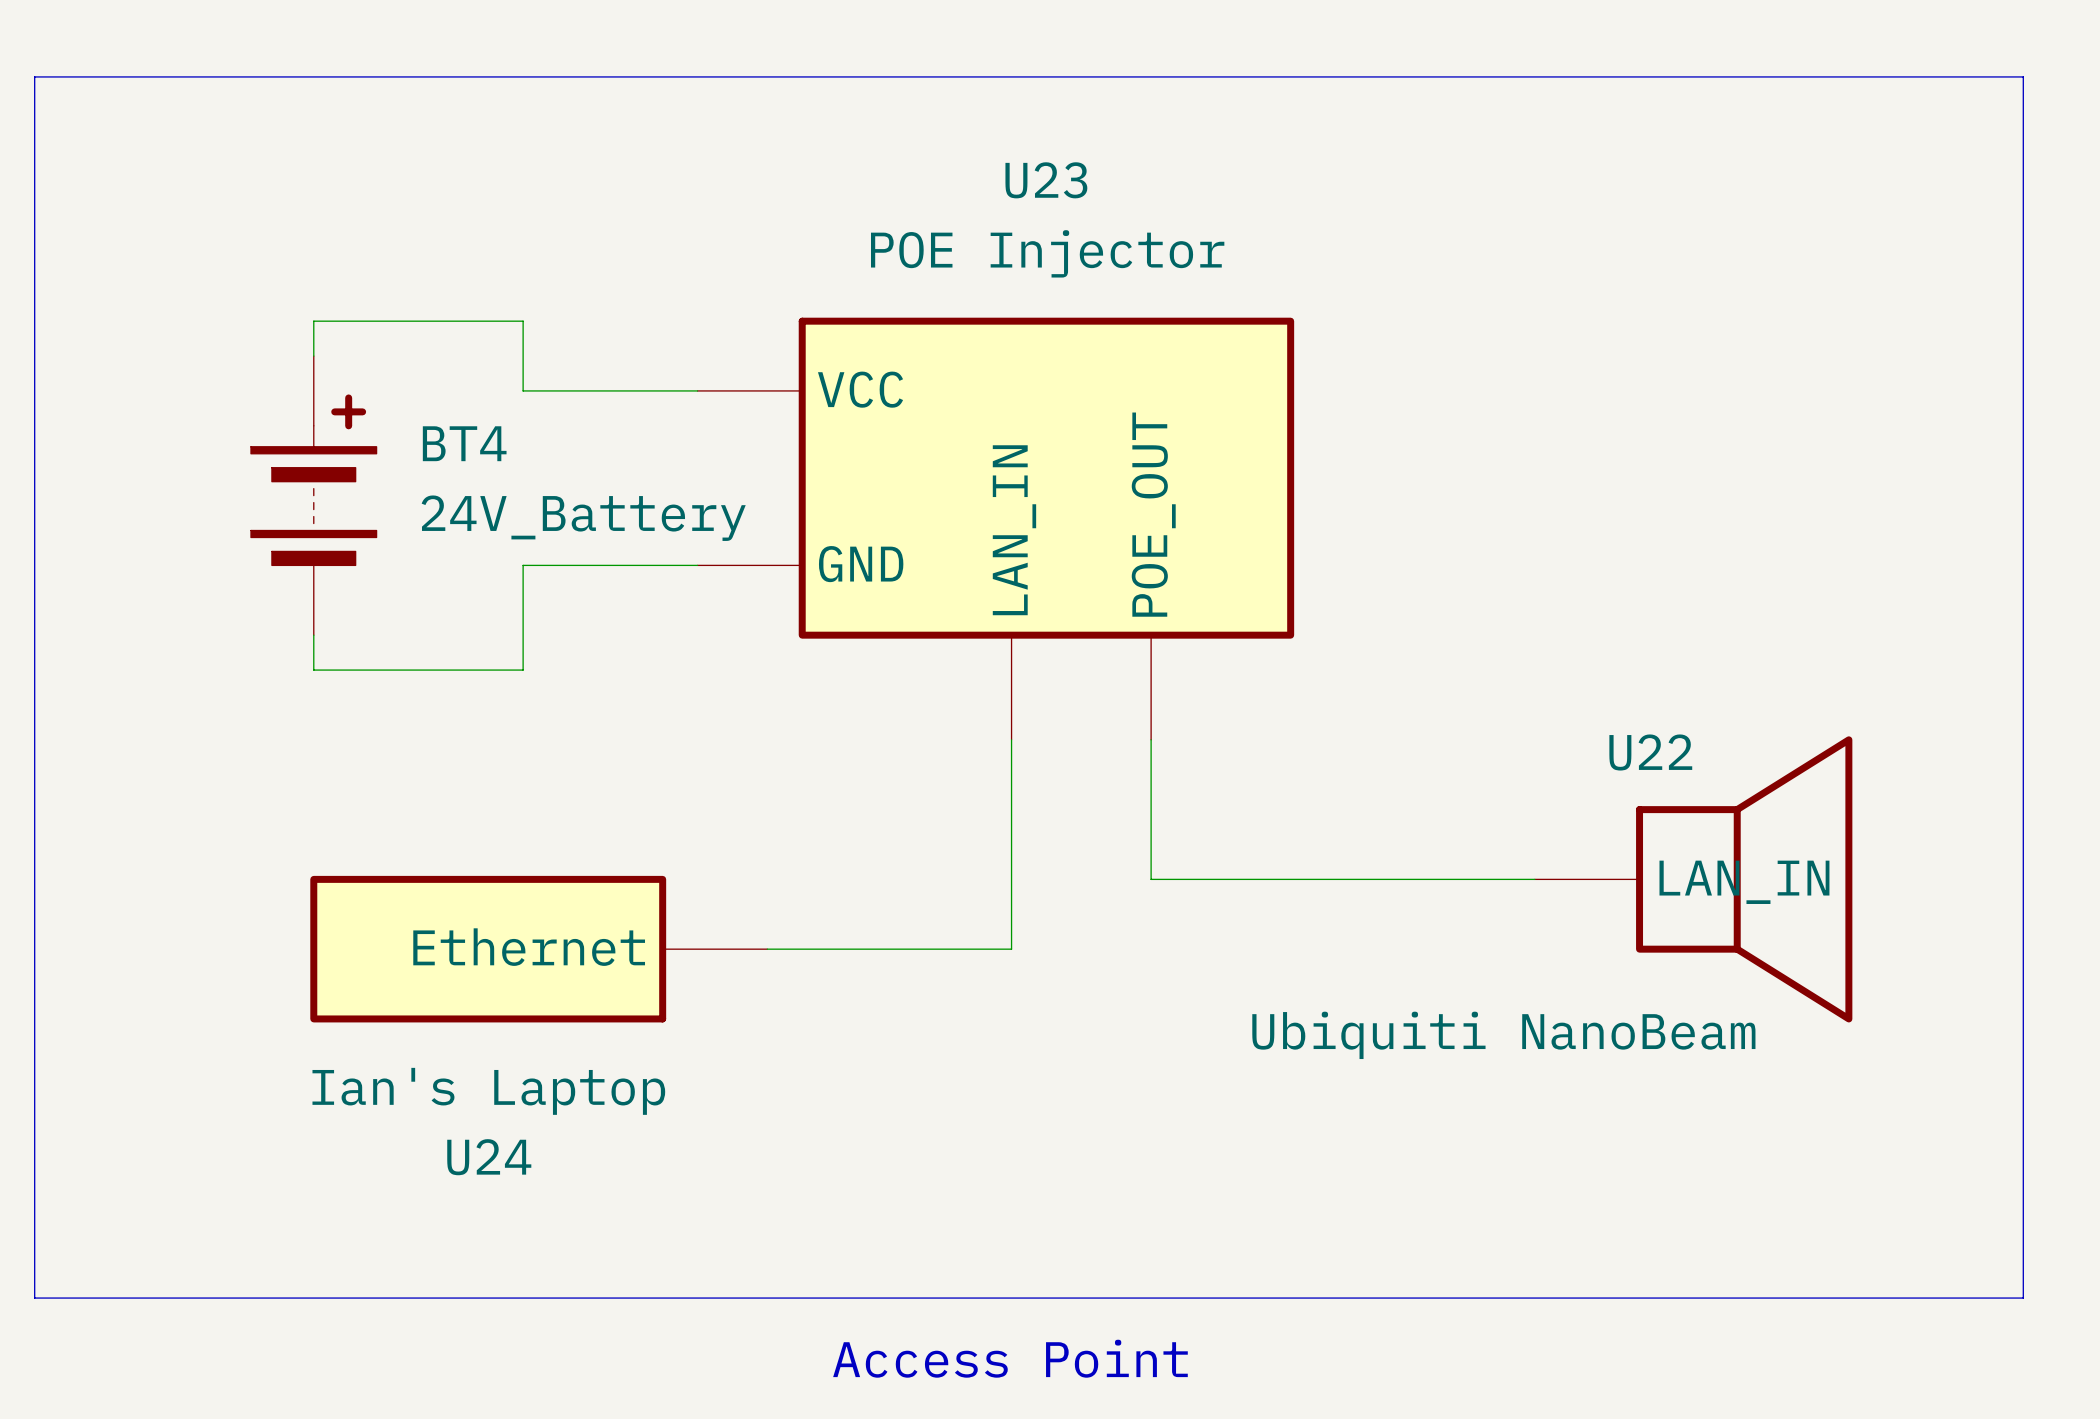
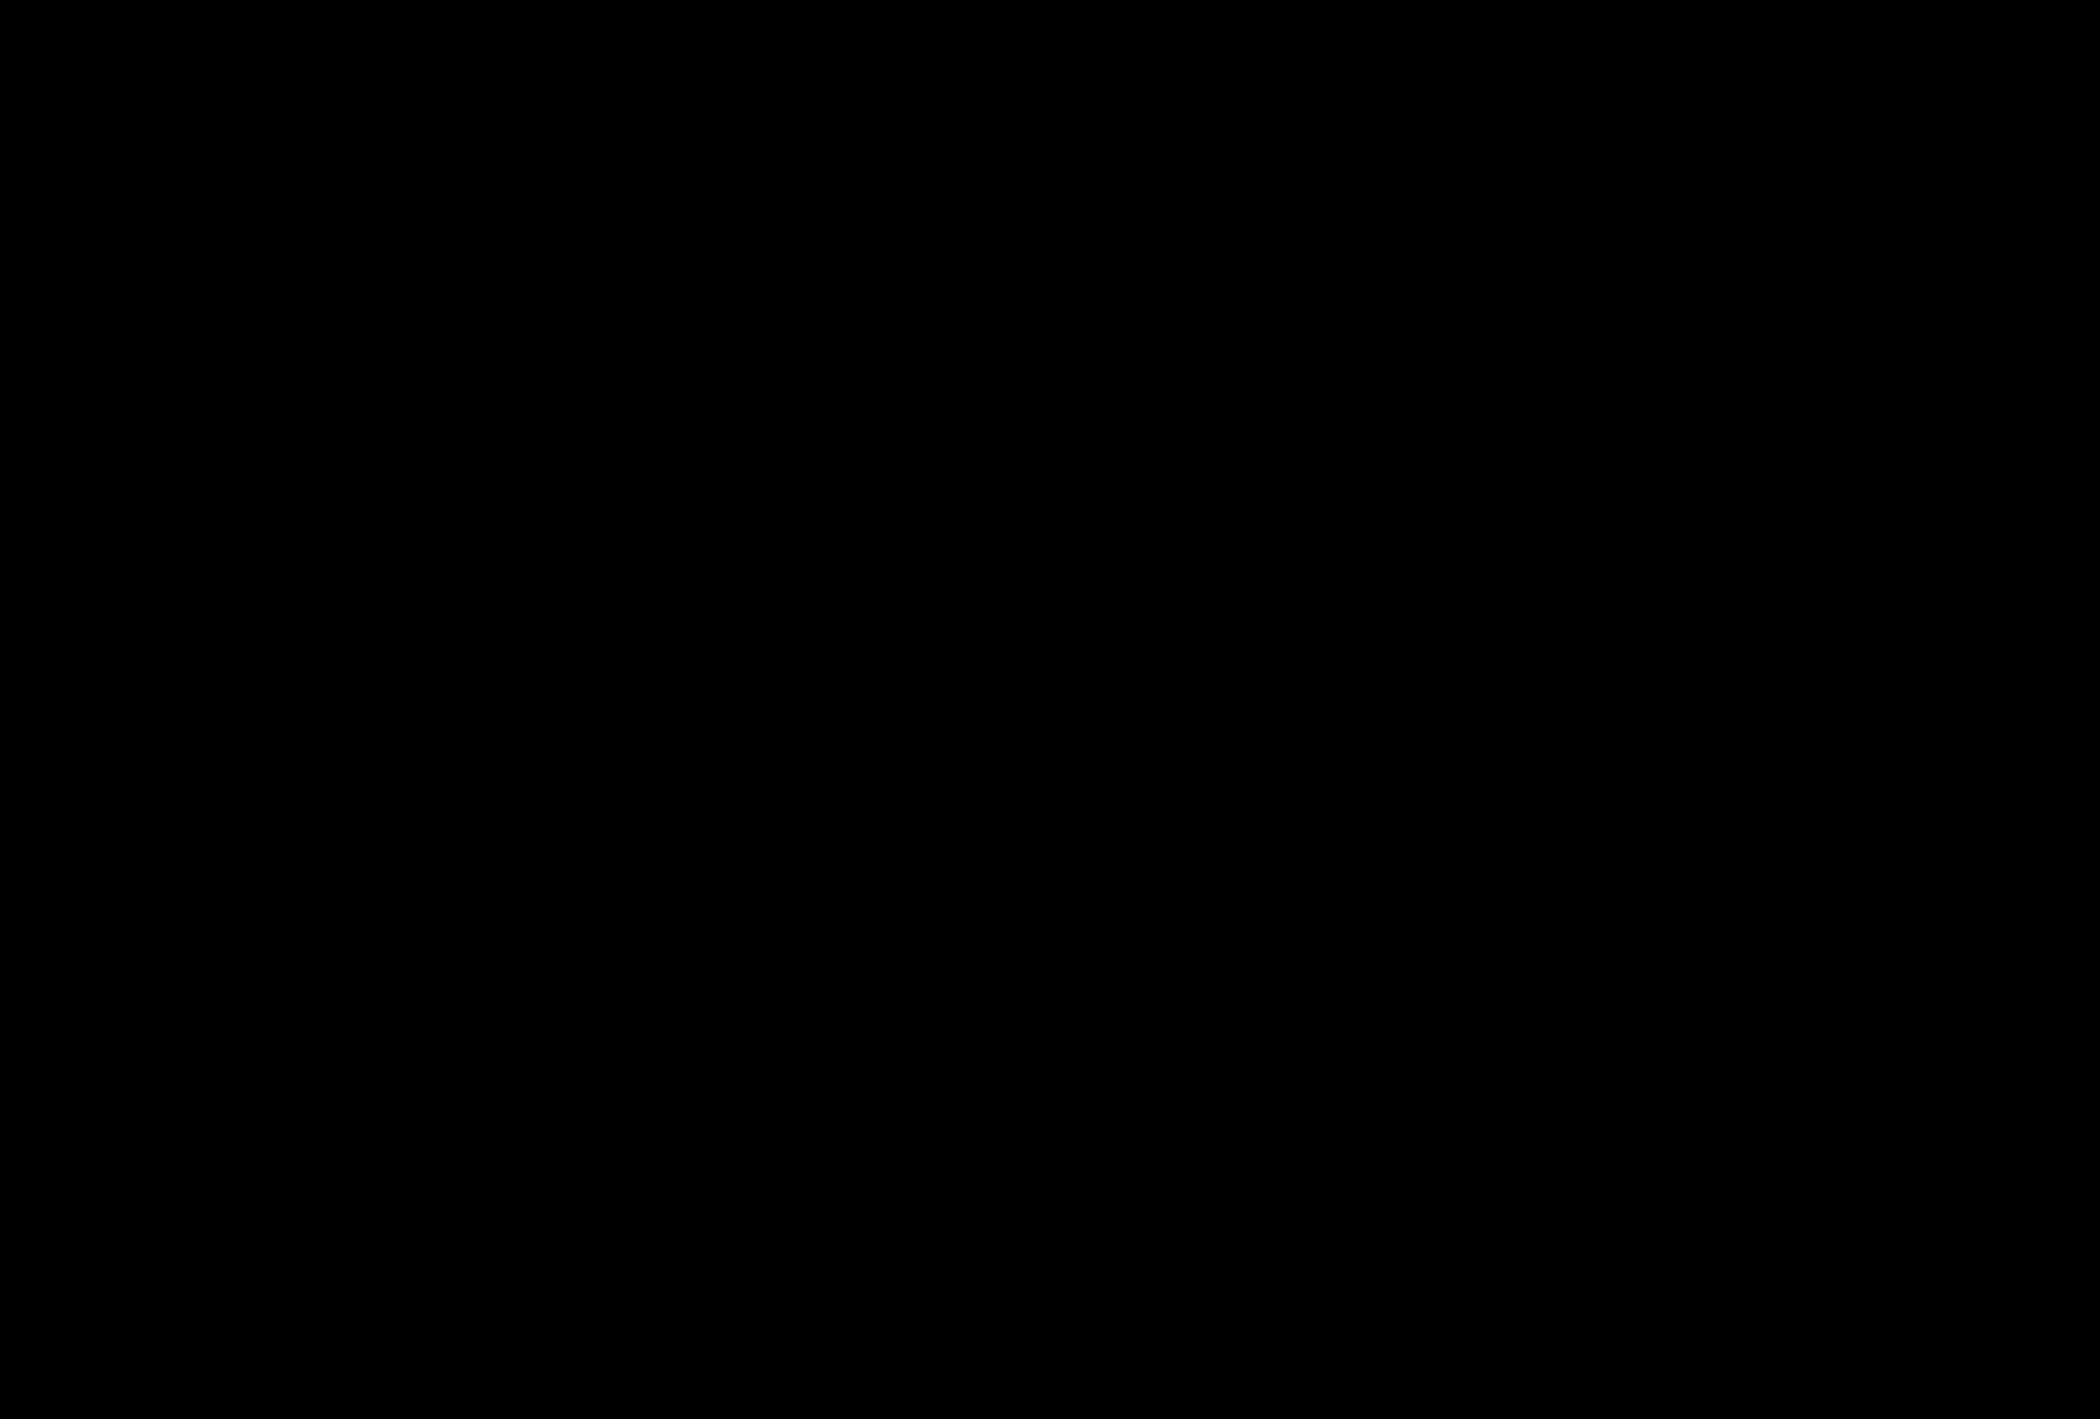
line: (34, 76) (2023, 76) (2023, 1298) (34, 1298) (34, 76) -> none
wire: (313, 356) (313, 321) (523, 321) (523, 390) (697, 390) -> none
BT4: 24V_Battery (313, 495) -> none
U23: POE Injector (995, 528) -> none
wire: (697, 565) (523, 565) (523, 670) (313, 670) (313, 635) -> none
wire: (1011, 739) (1011, 949) (767, 949) -> none
wire: (1151, 739) (1151, 879) (1534, 879) -> none
U22: Ubiquiti NanoBeam (1693, 879) -> none
U24: Ian's Laptop (538, 949) -> none
text: Access Point (1010, 1358) -> none

